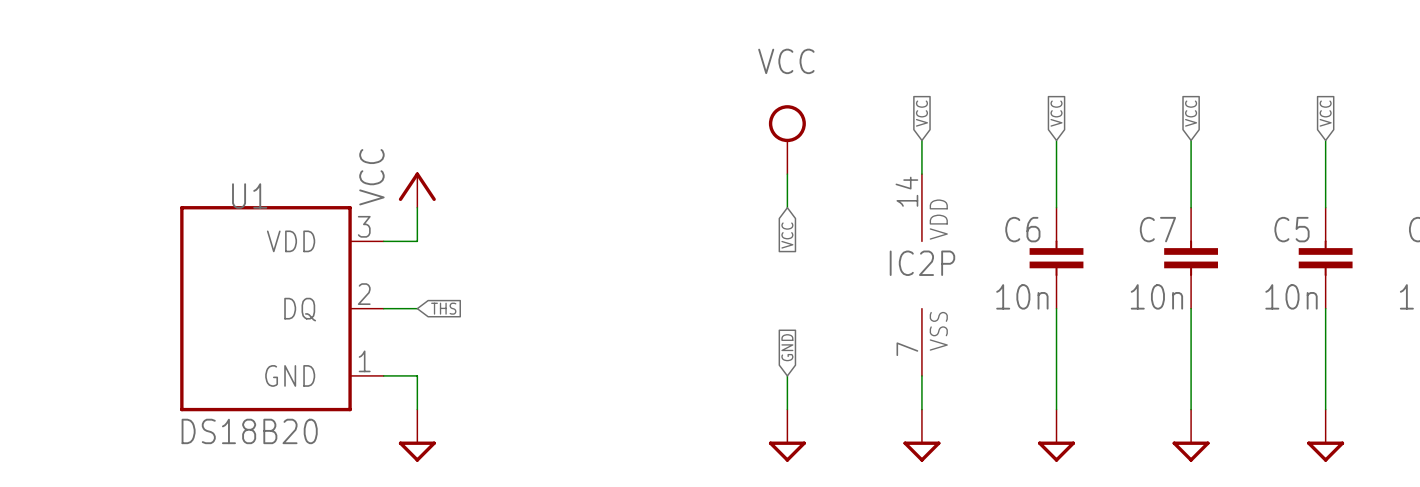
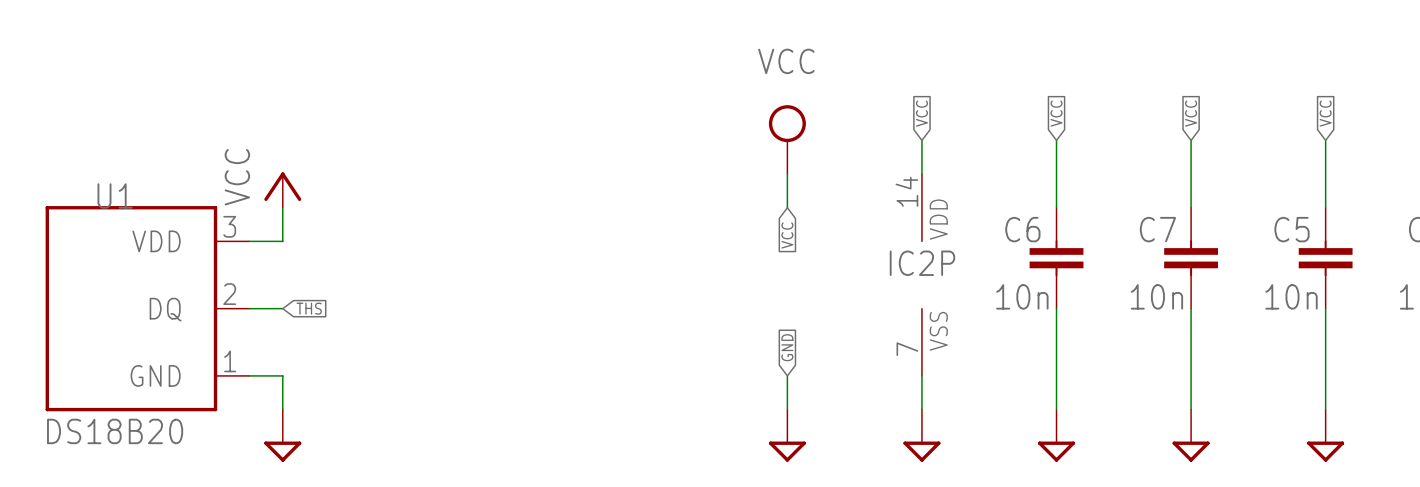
power symbol position: VCC (417, 190) -> VCC (282, 190)
wire: (417, 207) (417, 241) (383, 241) -> (282, 207) (282, 241) (249, 241)
U1 position: (281, 308) -> (147, 308)
wire: (383, 308) (417, 308) -> (249, 308) (282, 308)
global label position: THS (443, 308) -> THS (309, 308)
wire: (383, 375) (417, 375) (417, 409) -> (249, 375) (282, 375) (282, 409)
power symbol position: (417, 435) -> (282, 435)

